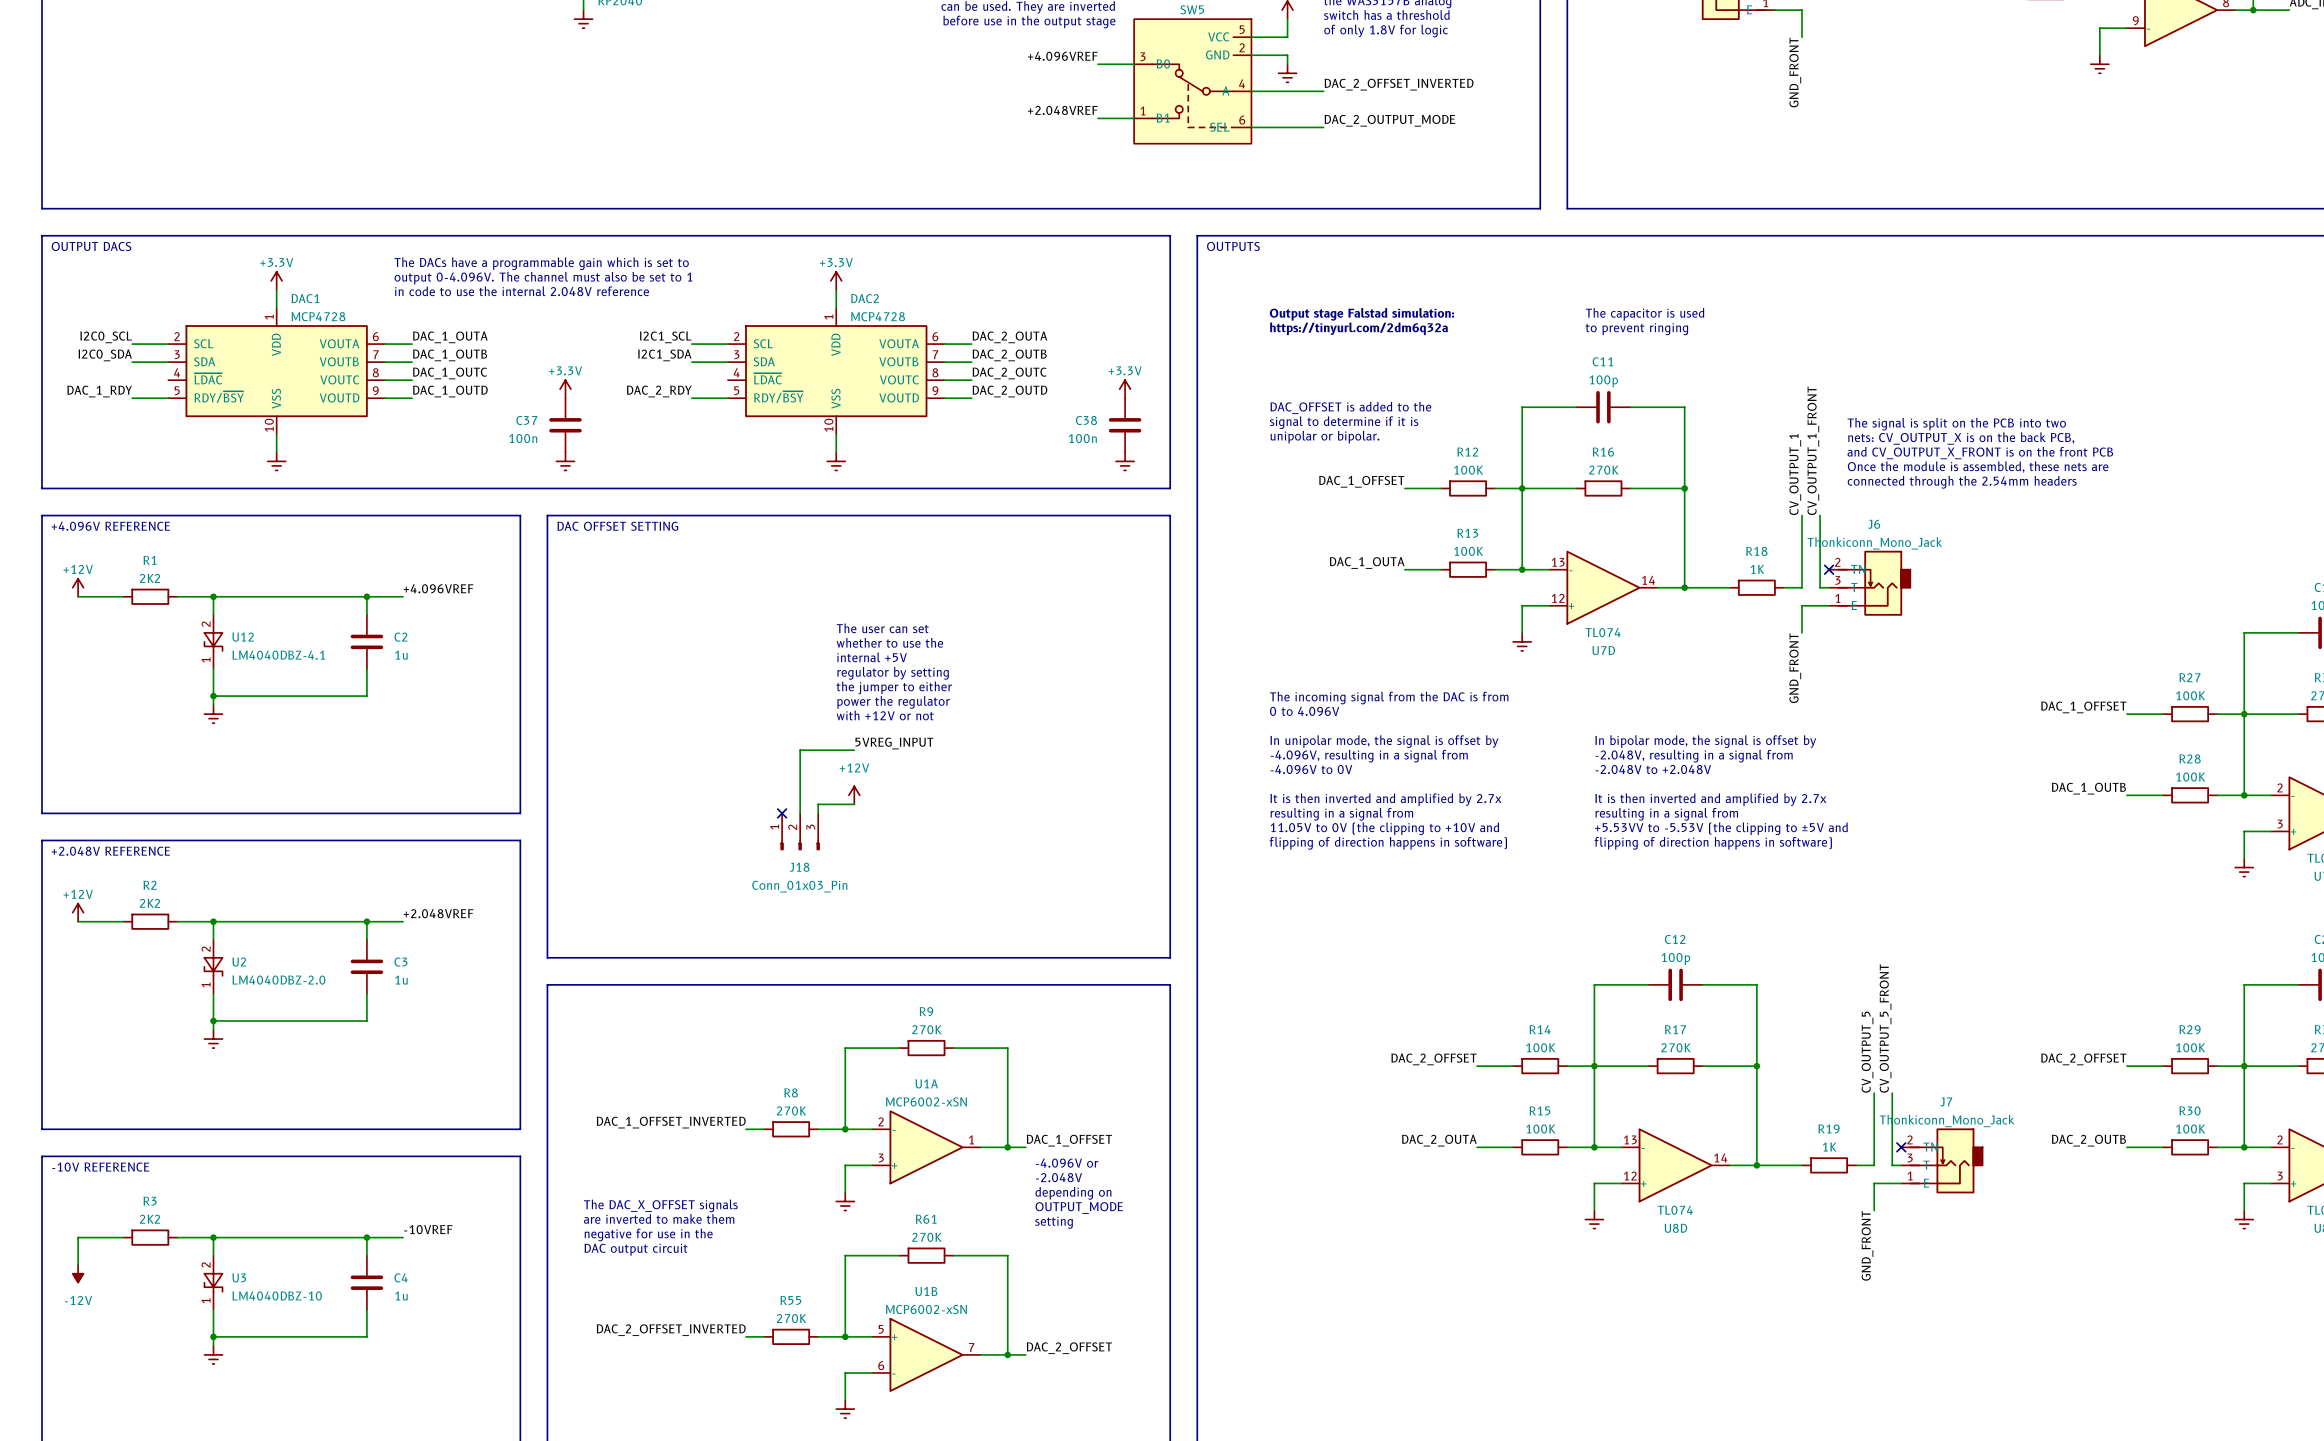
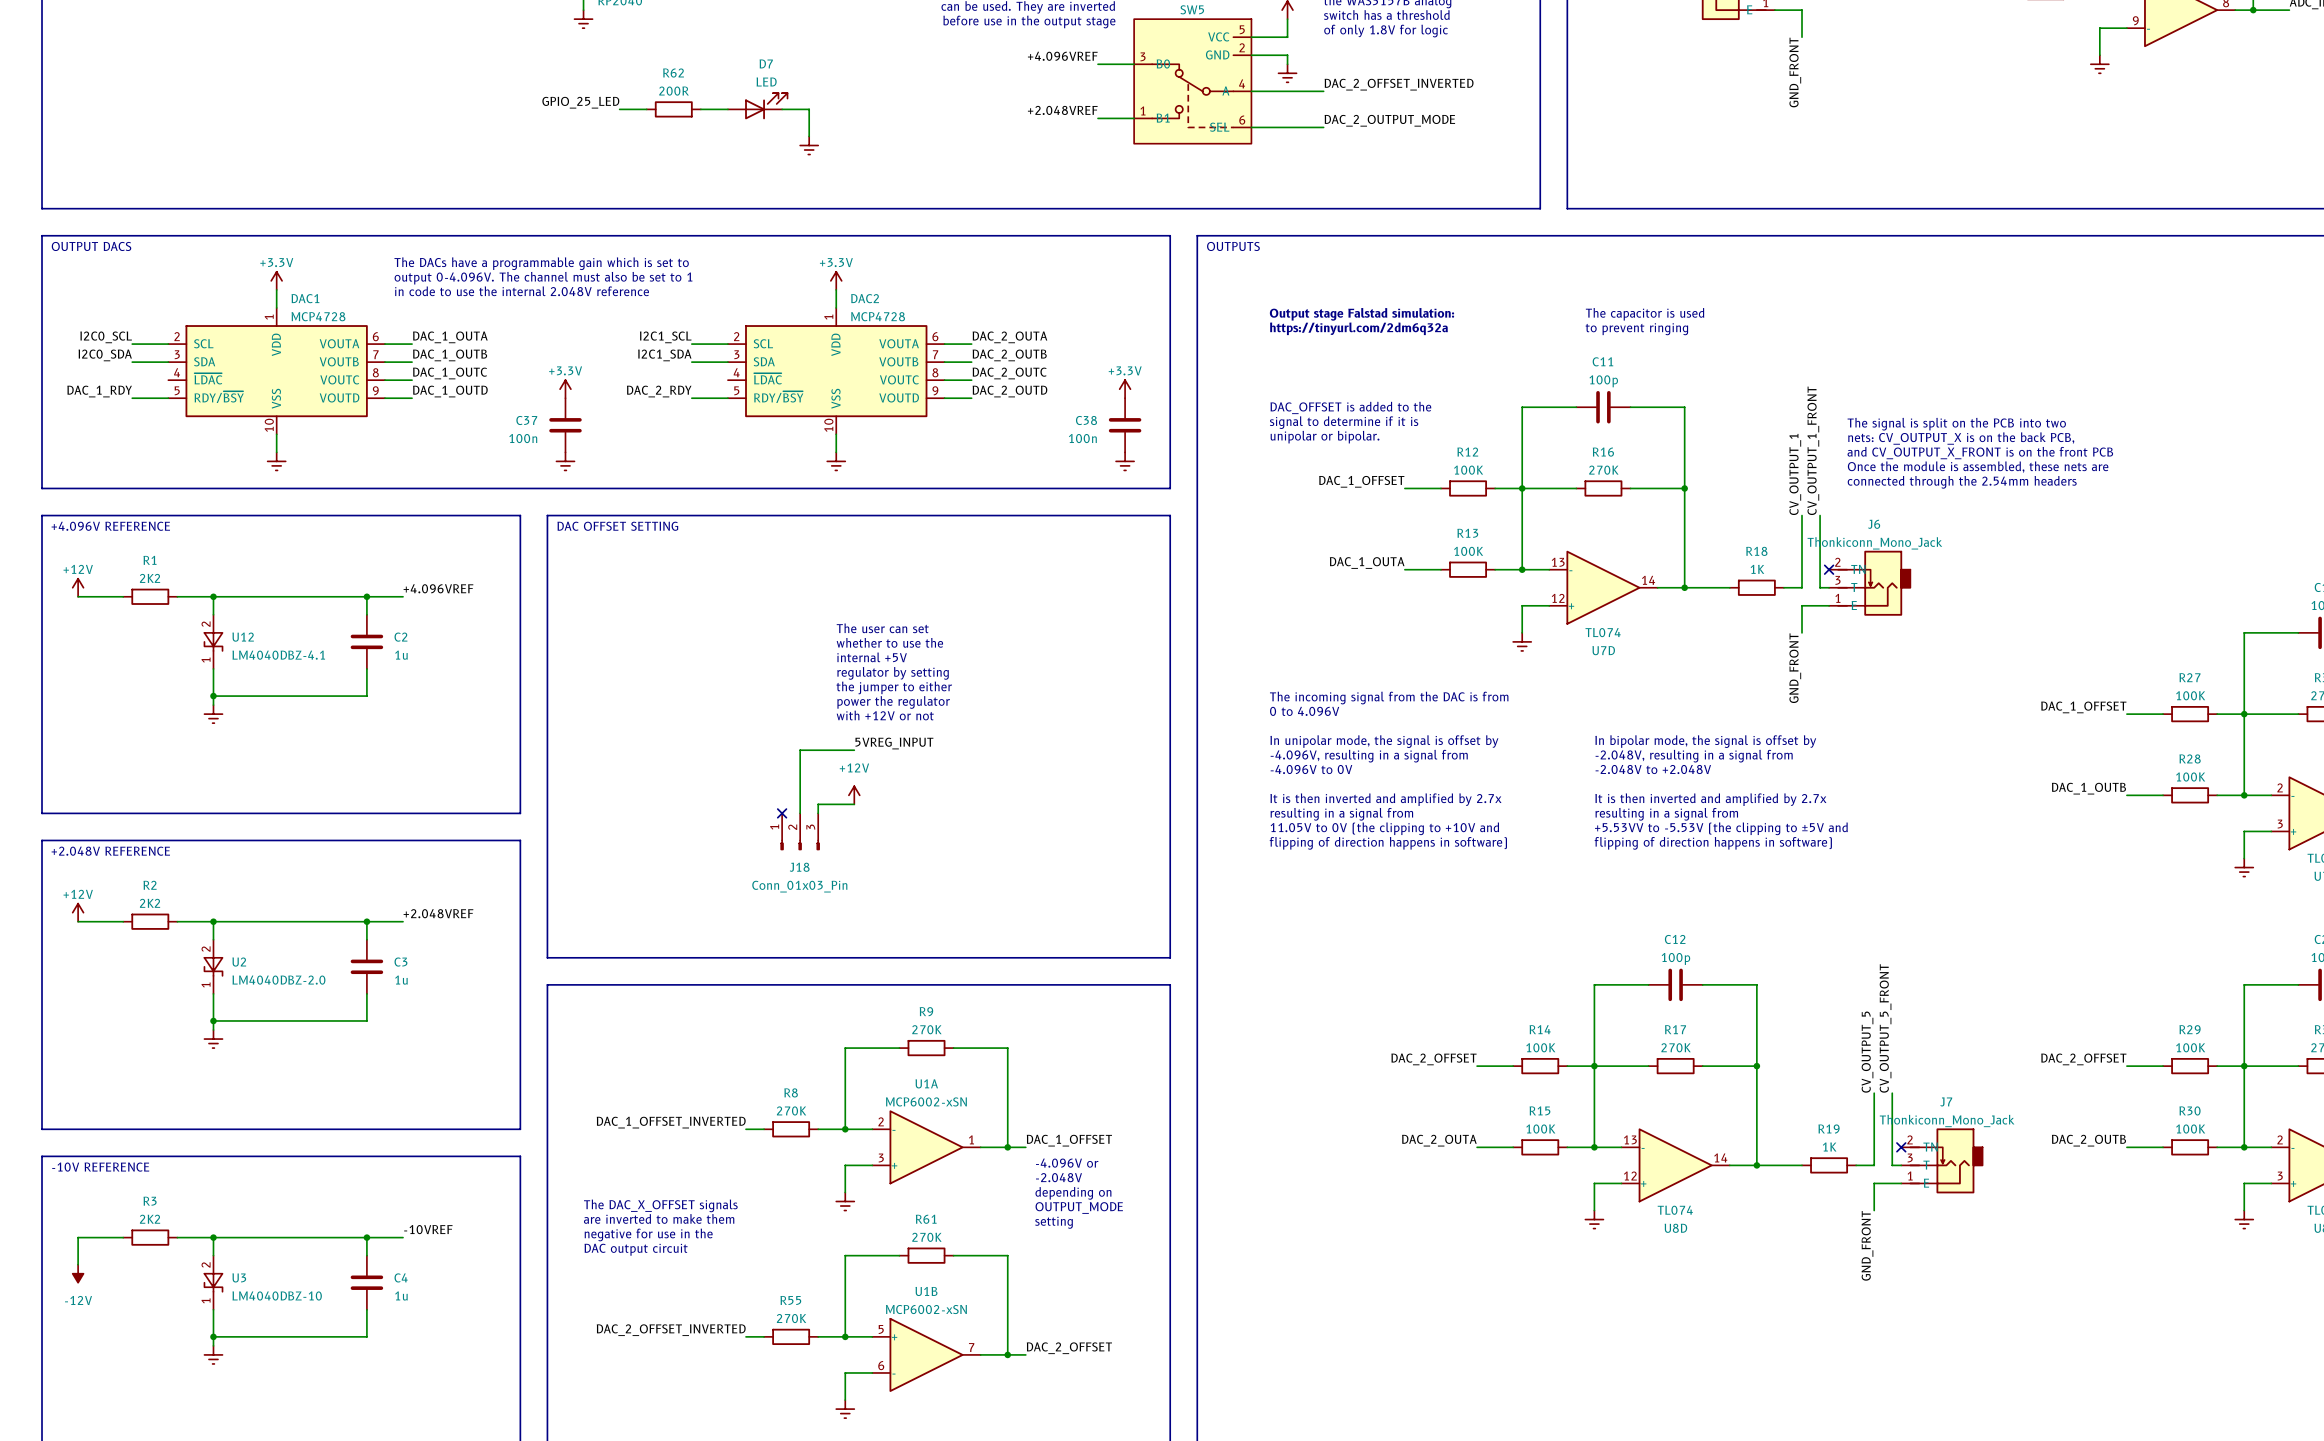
label: none -> GPIO_25_LED (580, 102)
D7: none -> LED (757, 106)
wire: none -> (619, 109) (646, 109)
R62: none -> 200R (673, 109)
wire: none -> (700, 109) (727, 109)
wire: none -> (782, 109) (809, 109) (809, 136)
power symbol: none -> (809, 145)

